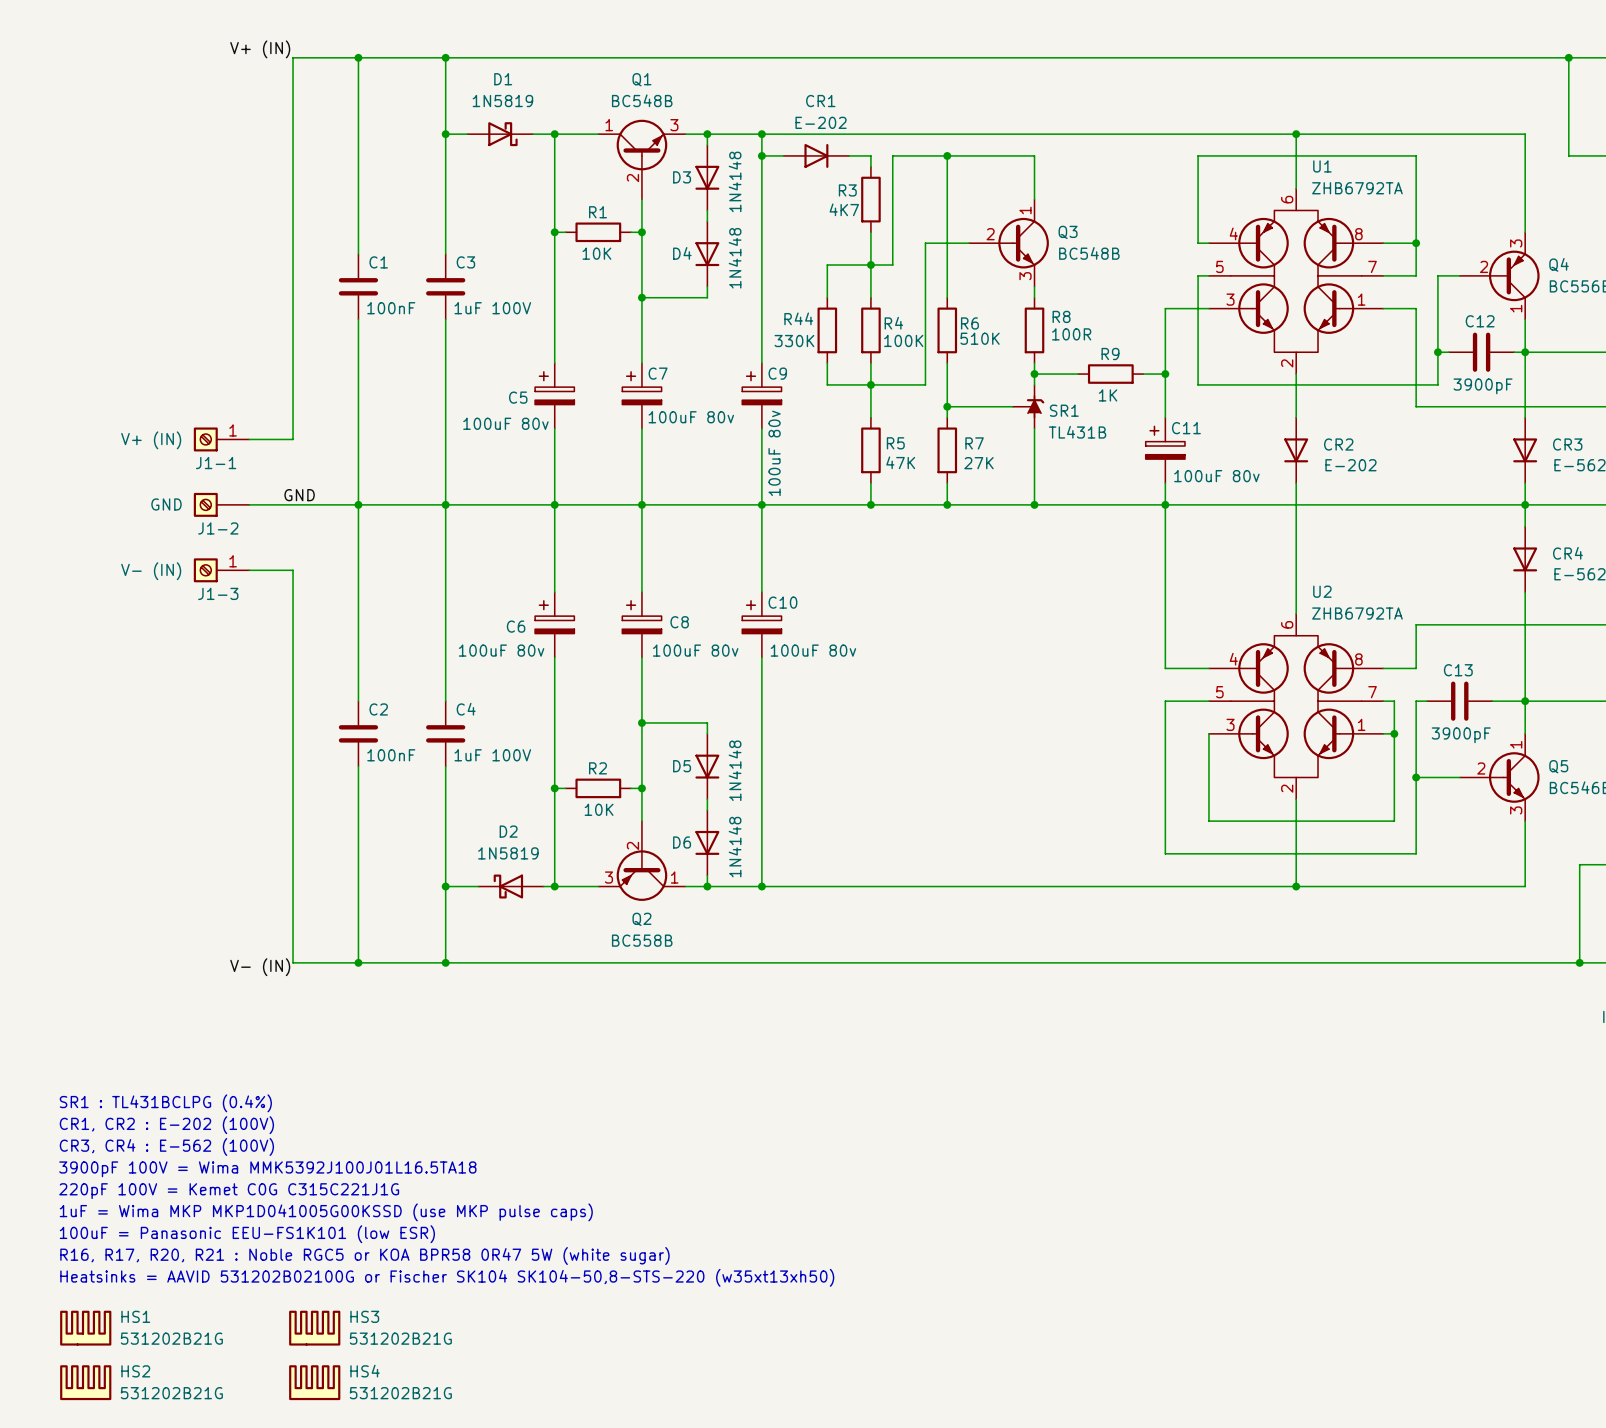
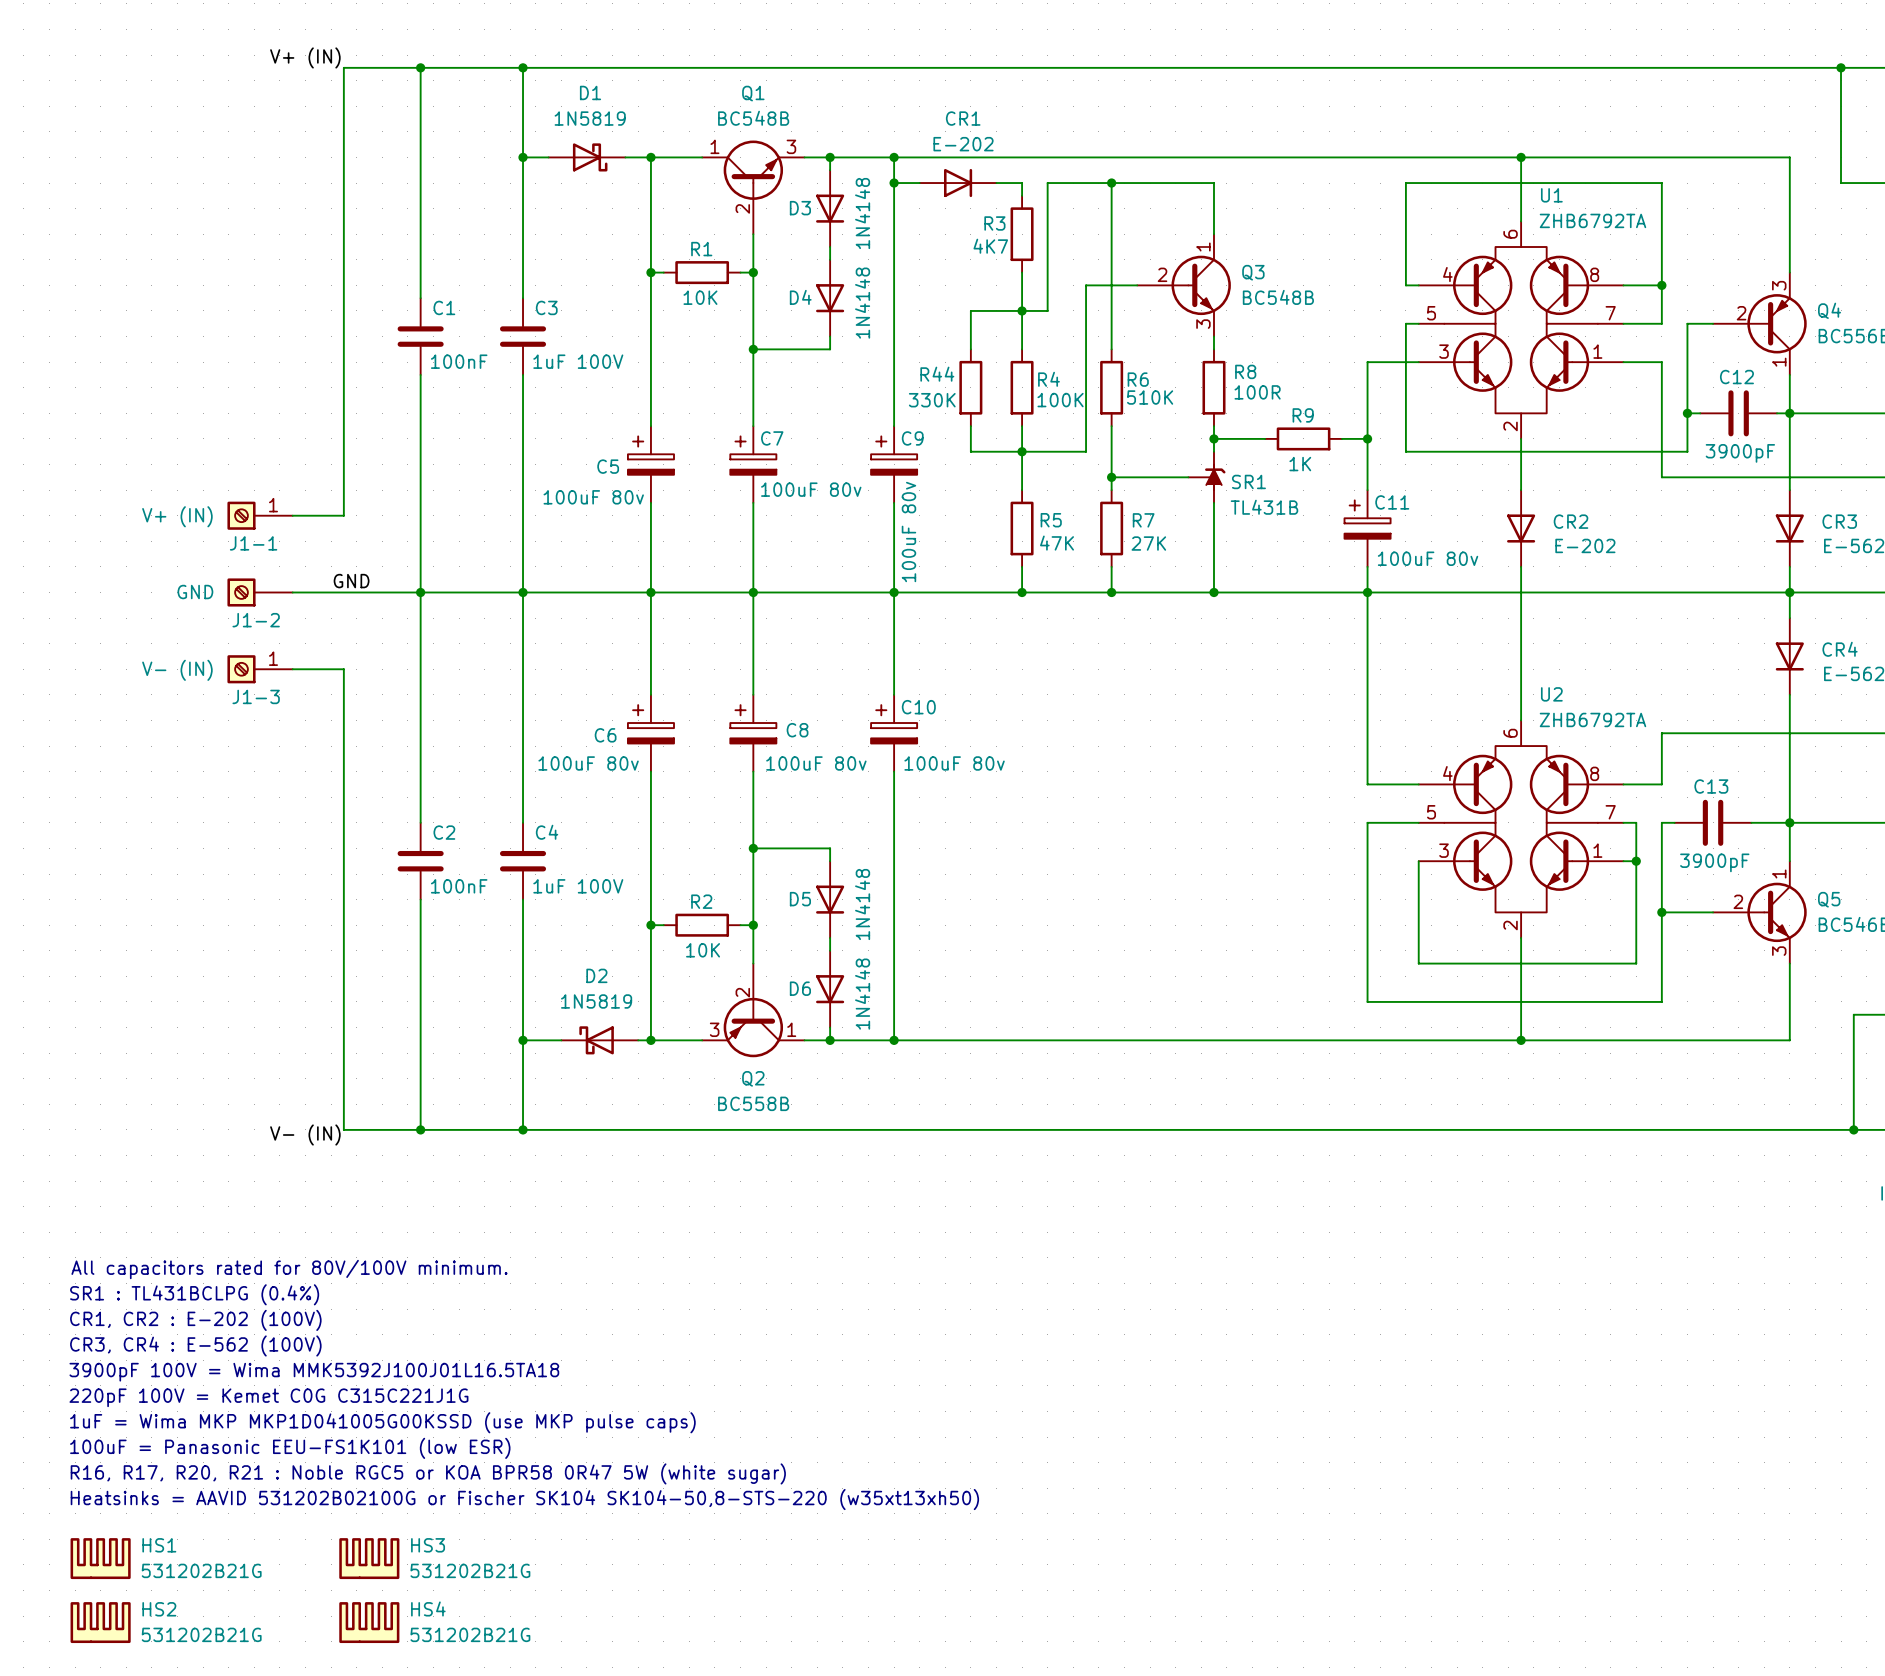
text: none -> All capacitors rated for 80V/100V minimum. (289, 1269)

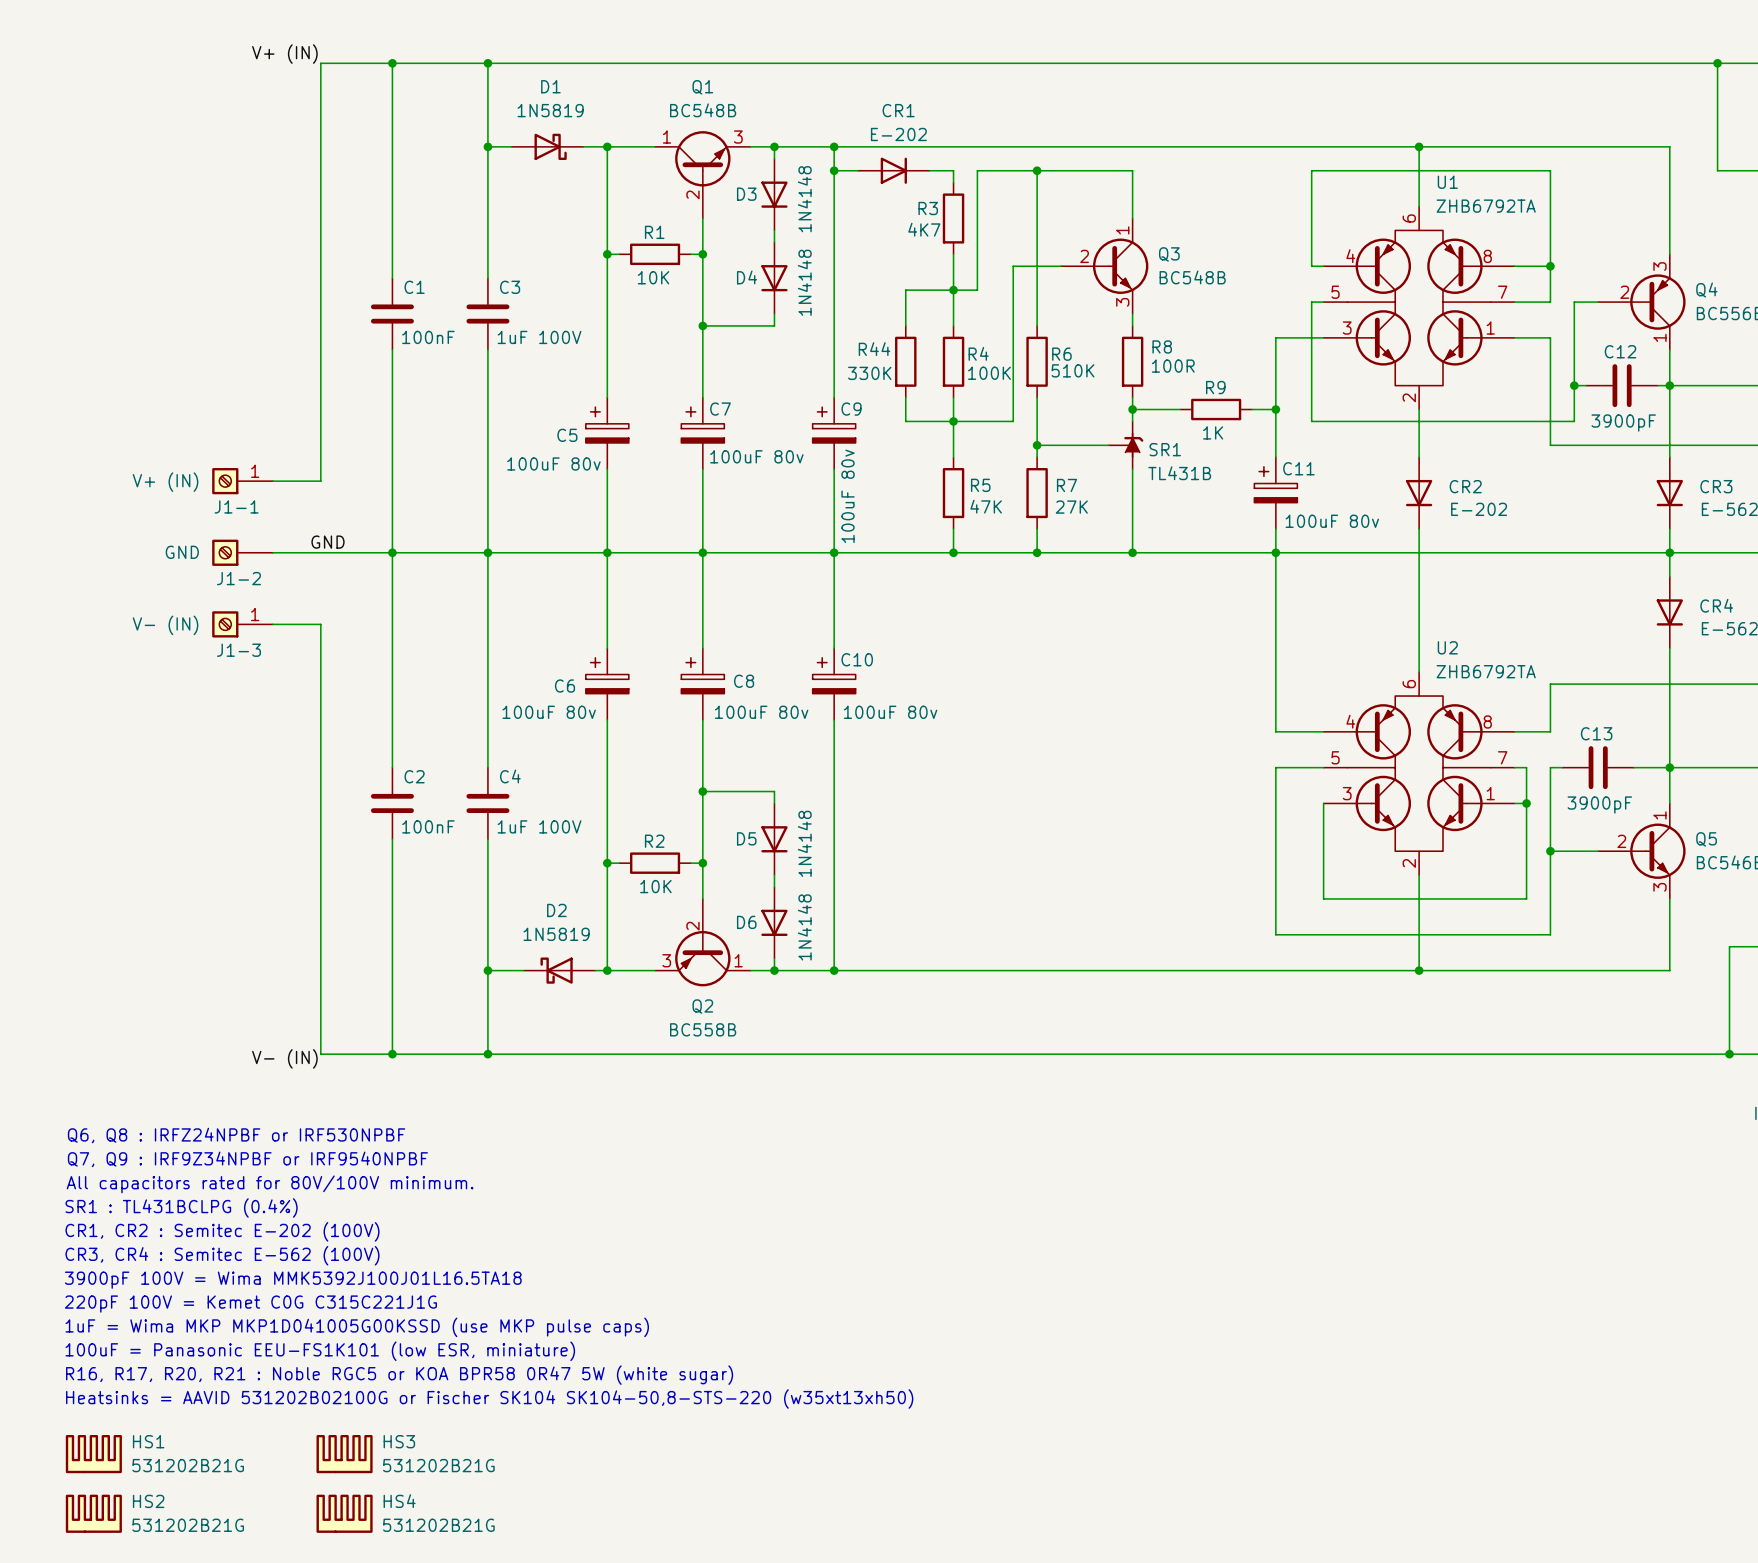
text: none -> Q6, Q8 : IRFZ24NPBF or IRF530NPBF (236, 1135)
text: none -> Q7, Q9 : IRF9Z34NPBF or IRF9540NPBF (247, 1159)
text: CR1, CR2 : E-202 (100V) (195, 1320) -> CR1, CR2 : Semitec E-202 (100V) (222, 1231)
text: CR3, CR4 : E-562 (100V) (195, 1345) -> CR3, CR4 : Semitec E-562 (100V) (222, 1255)
text: 100uF = Panasonic EEU-FS1K101 (low ESR) (290, 1448) -> 100uF = Panasonic EEU-FS1K101 (low ESR, miniature) (320, 1351)

